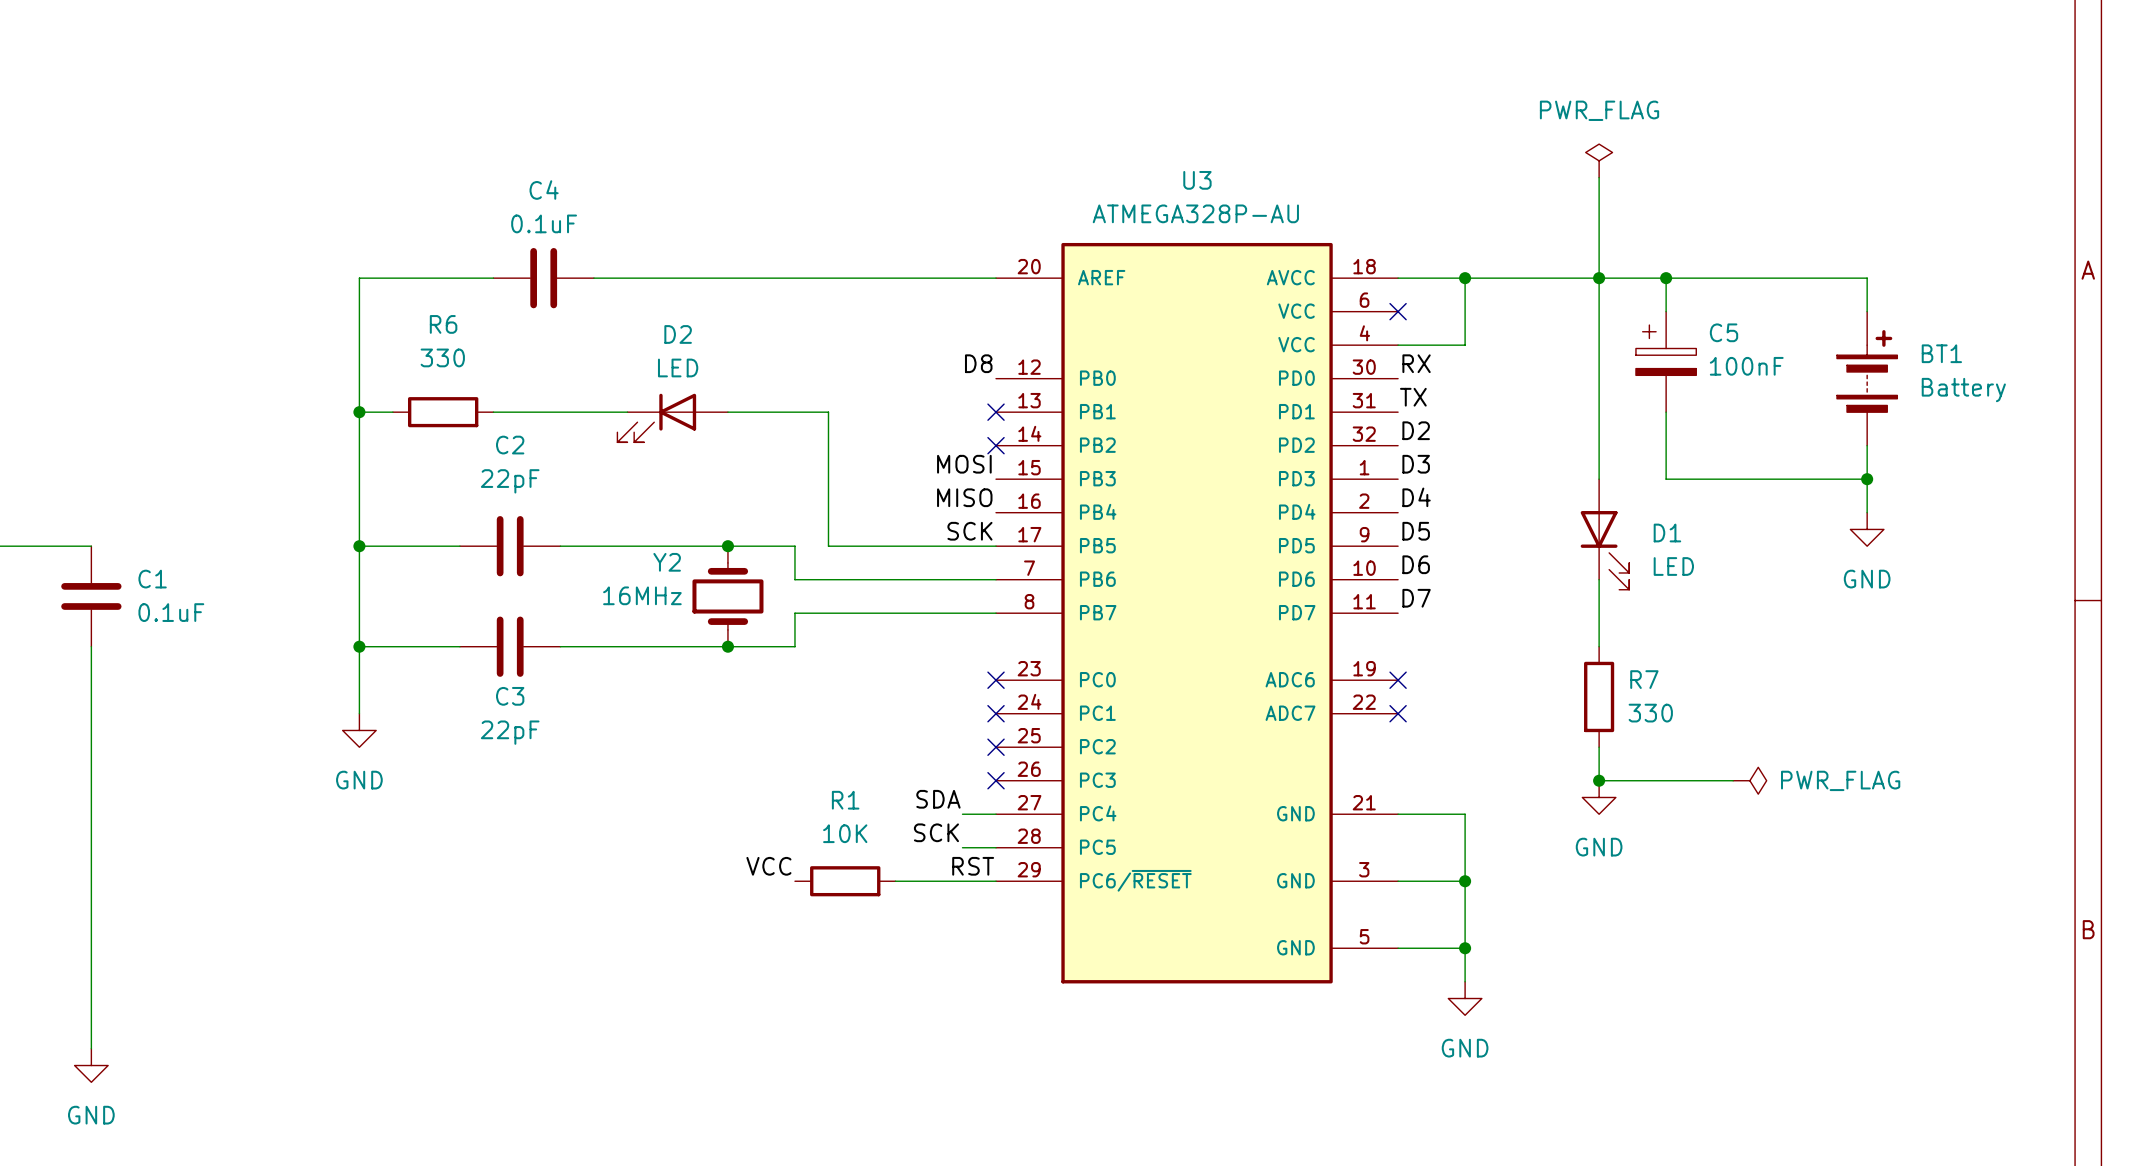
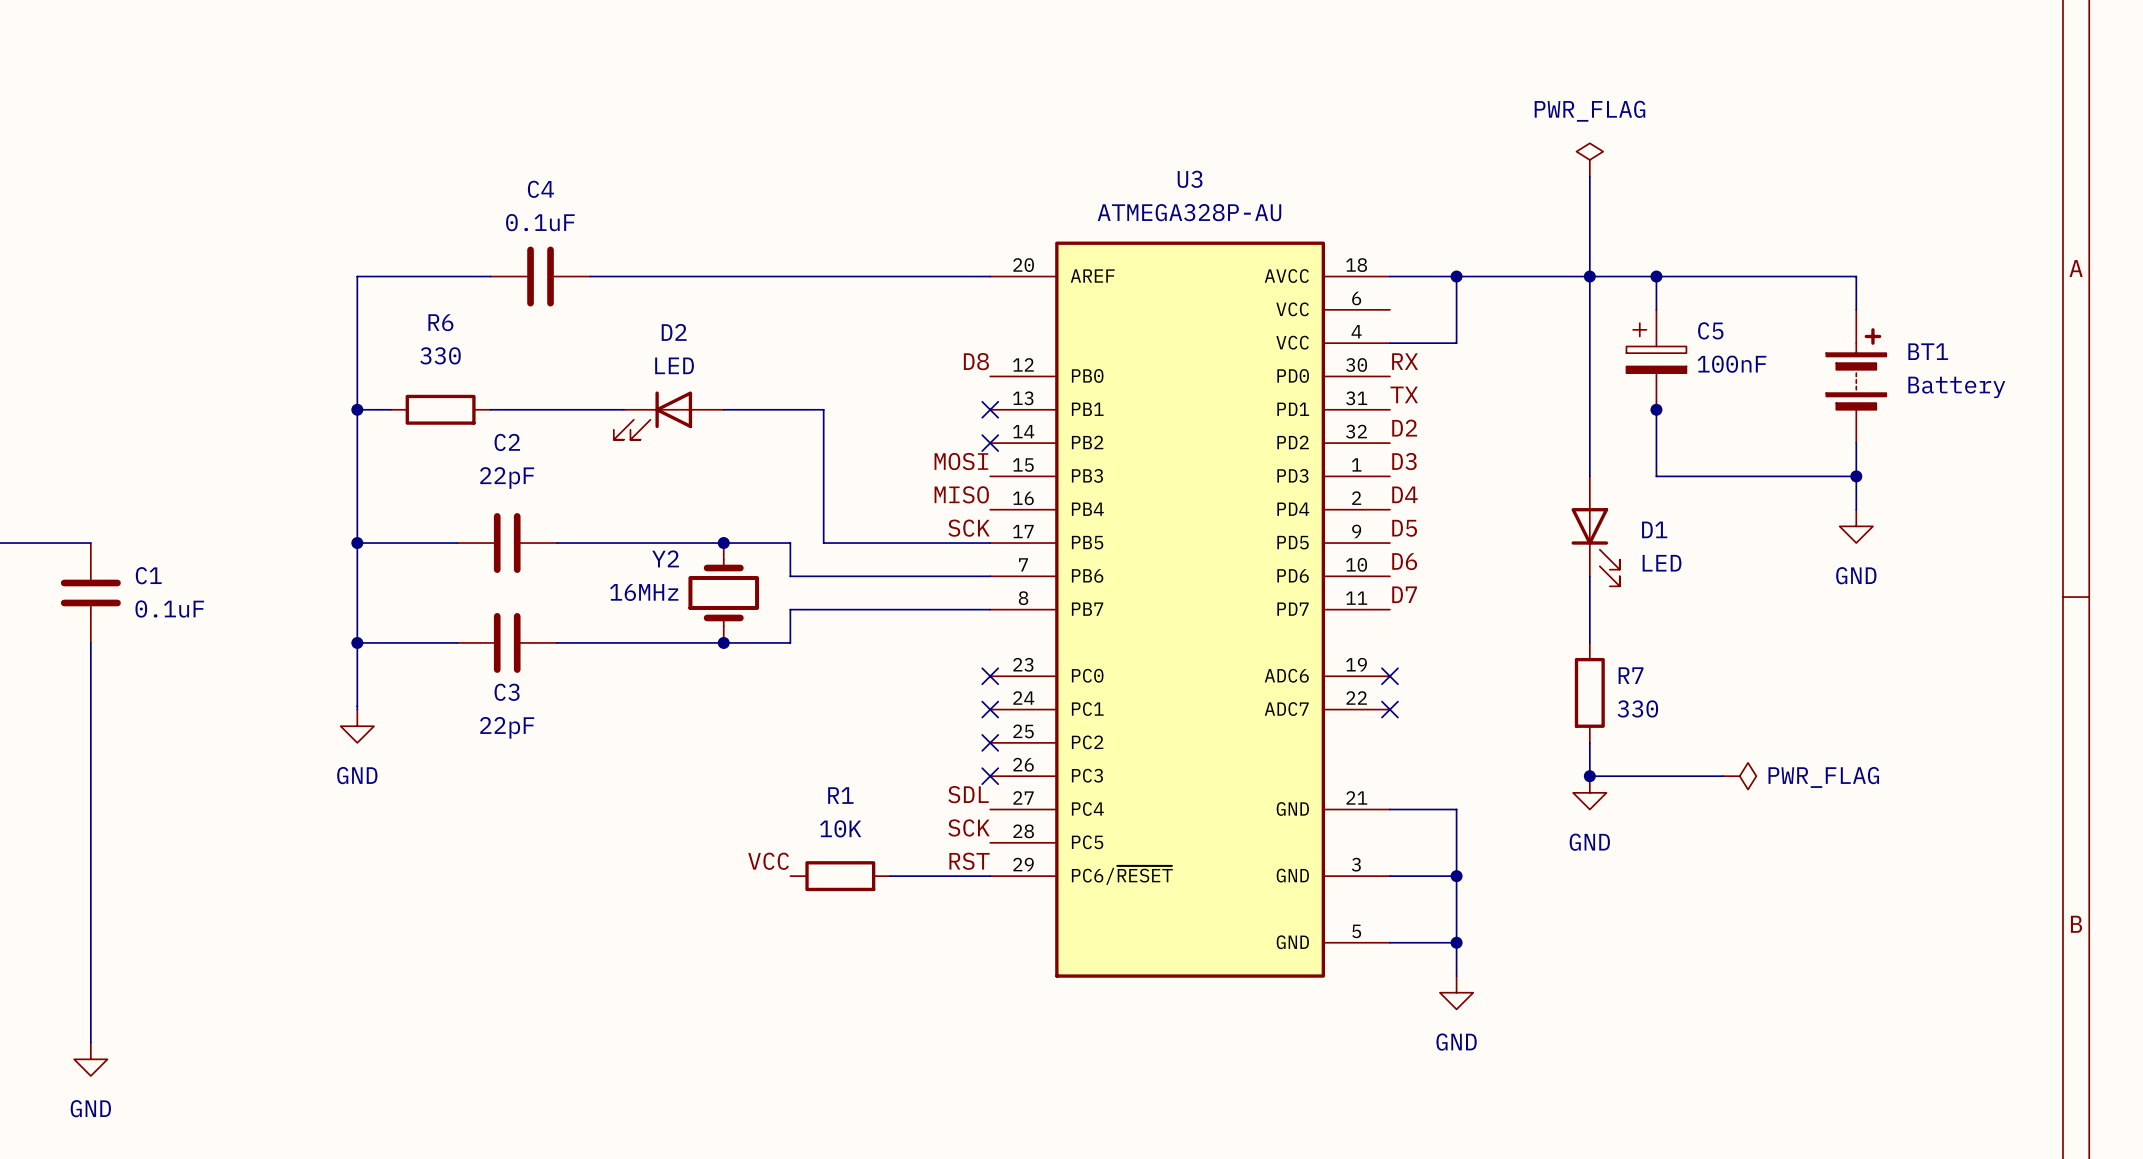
no-connect mark: (1398, 311) -> none
junction: none -> (1656, 409)
label: SDA (938, 799) -> SDL (968, 794)
wire: (962, 814) (996, 814) -> none
label position: SCK (936, 832) -> SCK (969, 827)
wire: (962, 847) (996, 847) -> none

